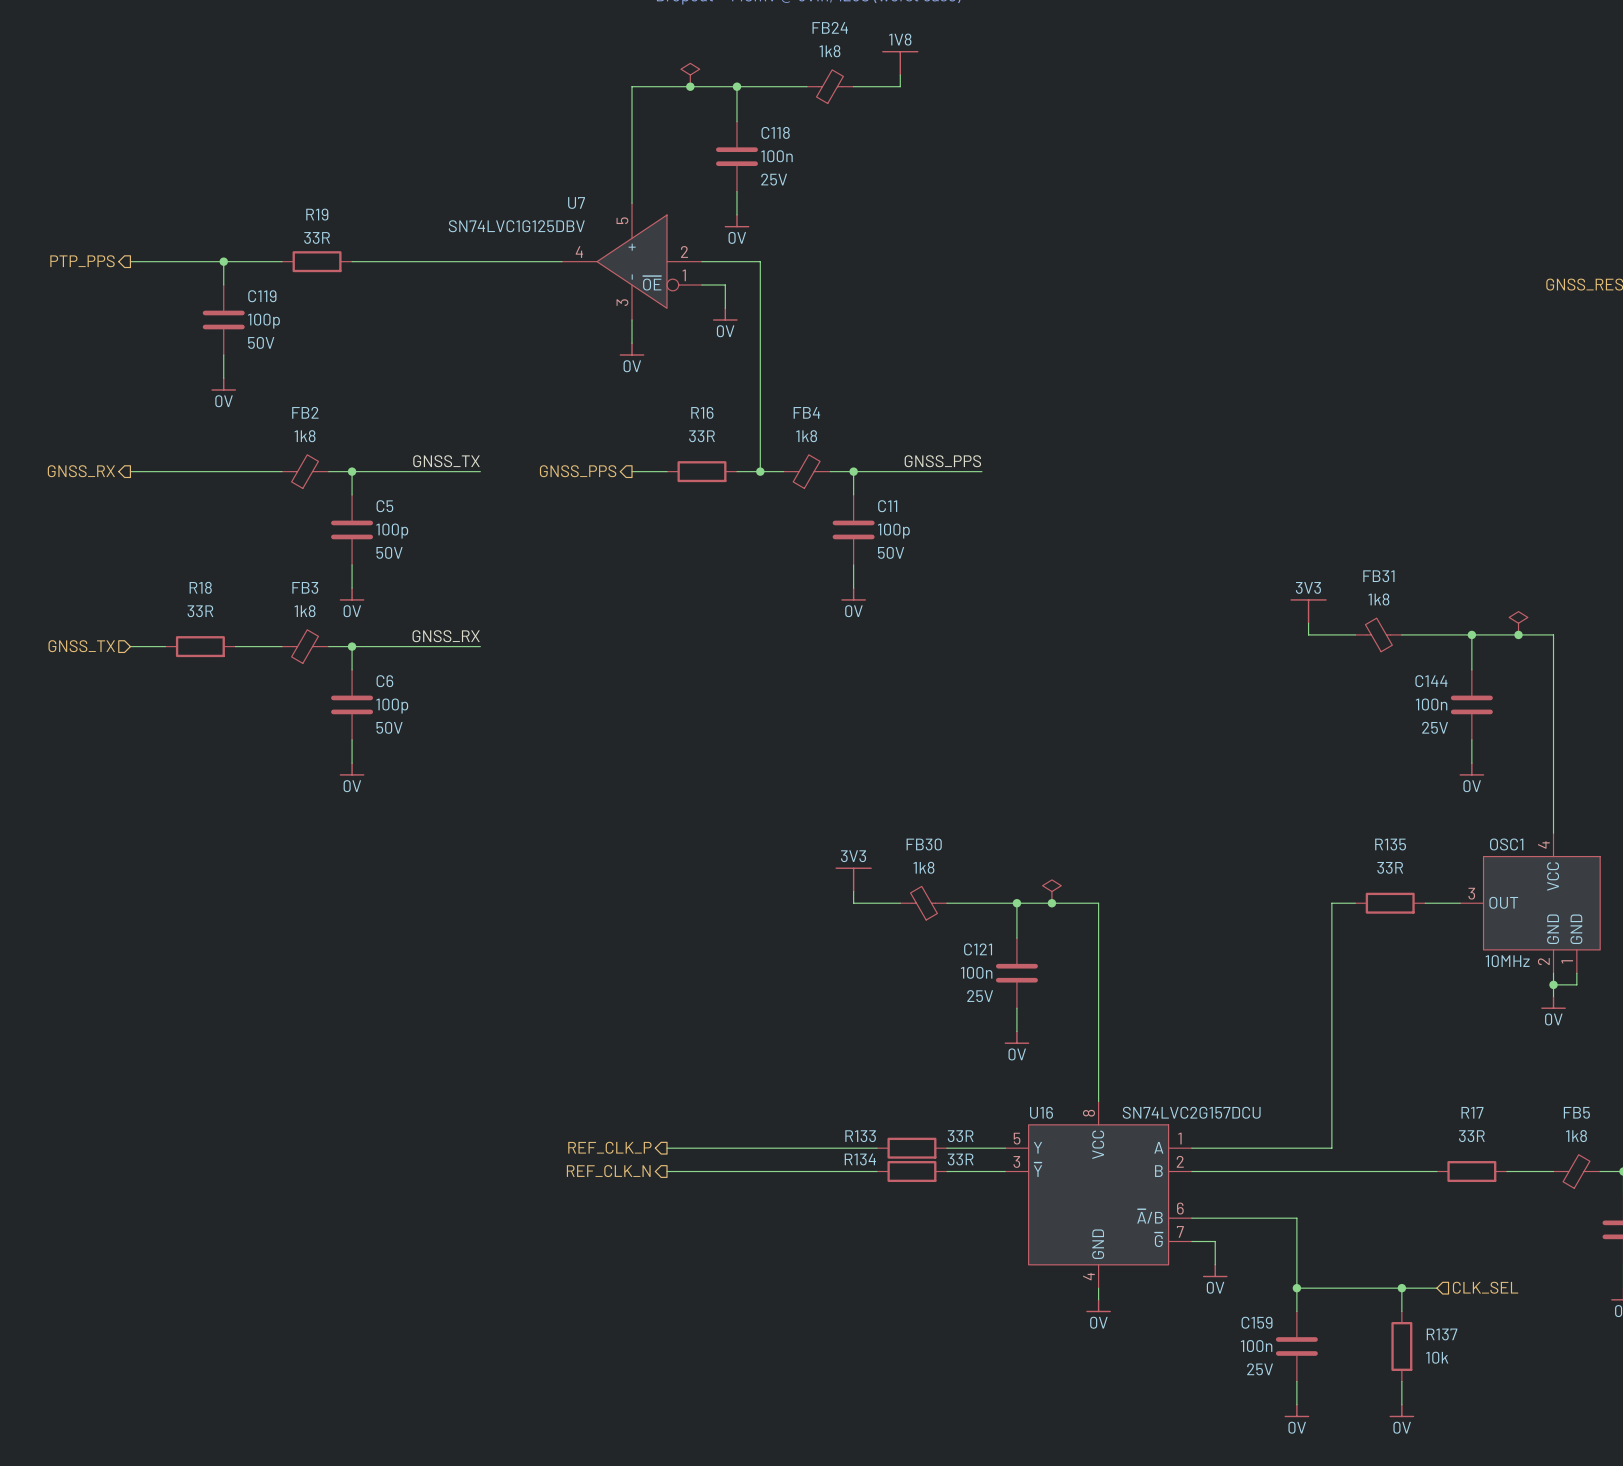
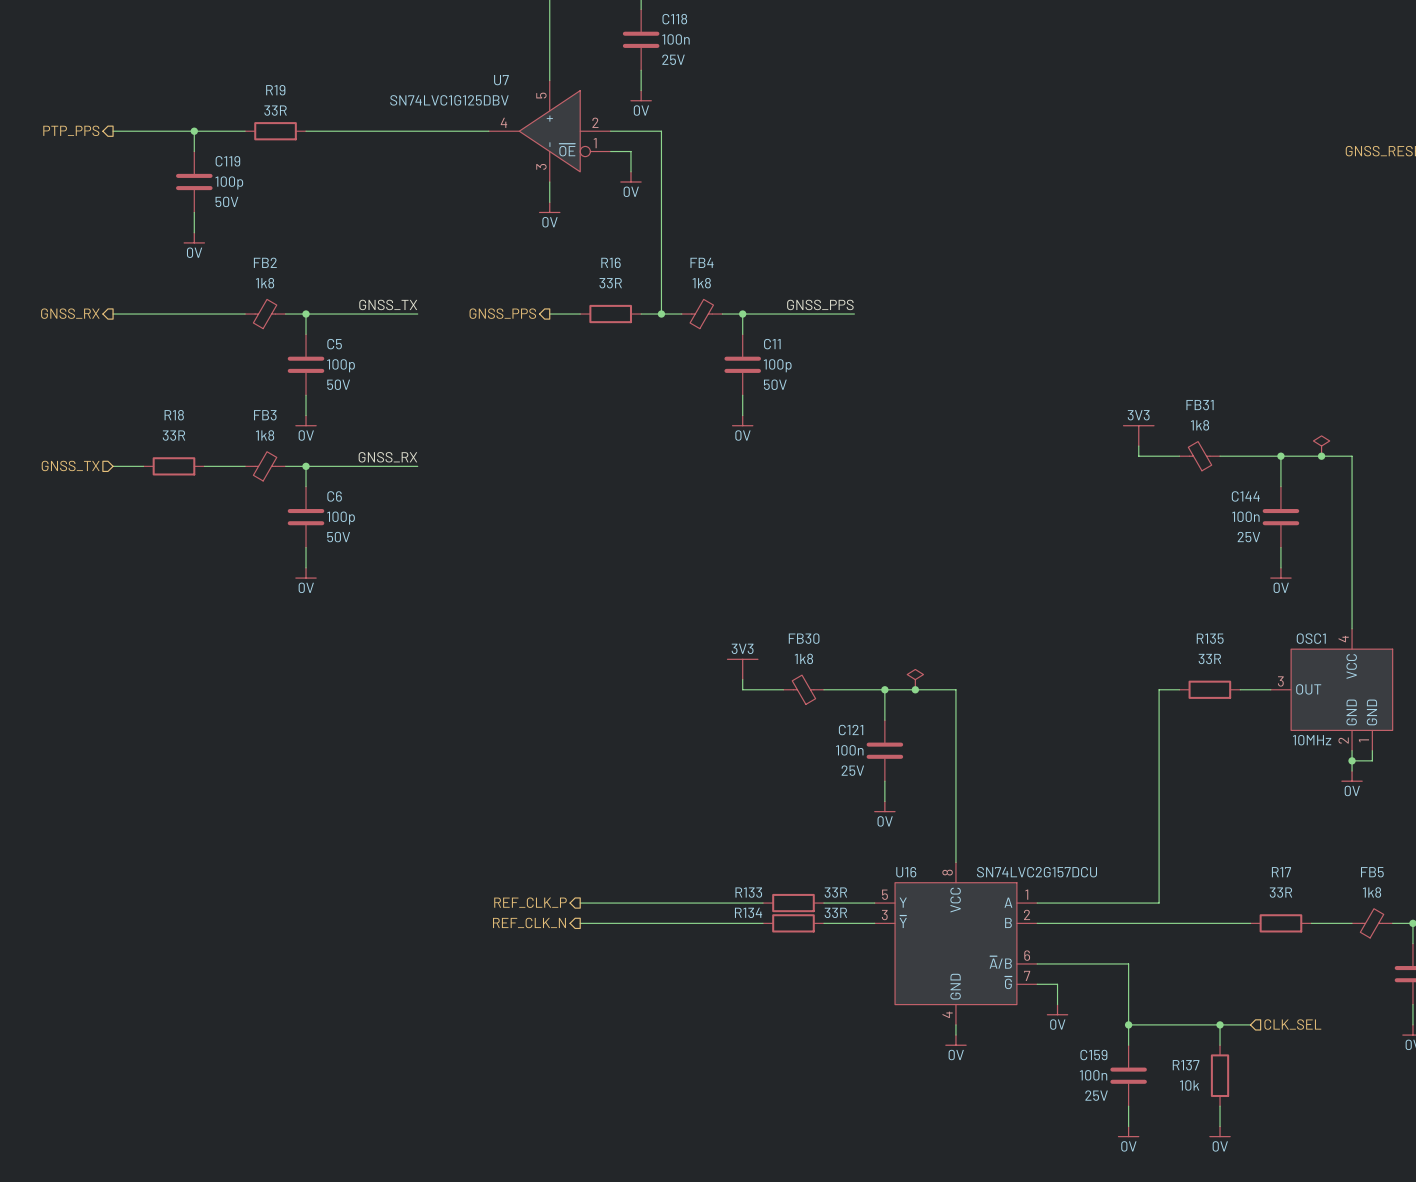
R137 name position: R137 (1442, 1334) -> R137 (1186, 1065)
R137 value position: 10k (1437, 1357) -> 10k (1189, 1085)

